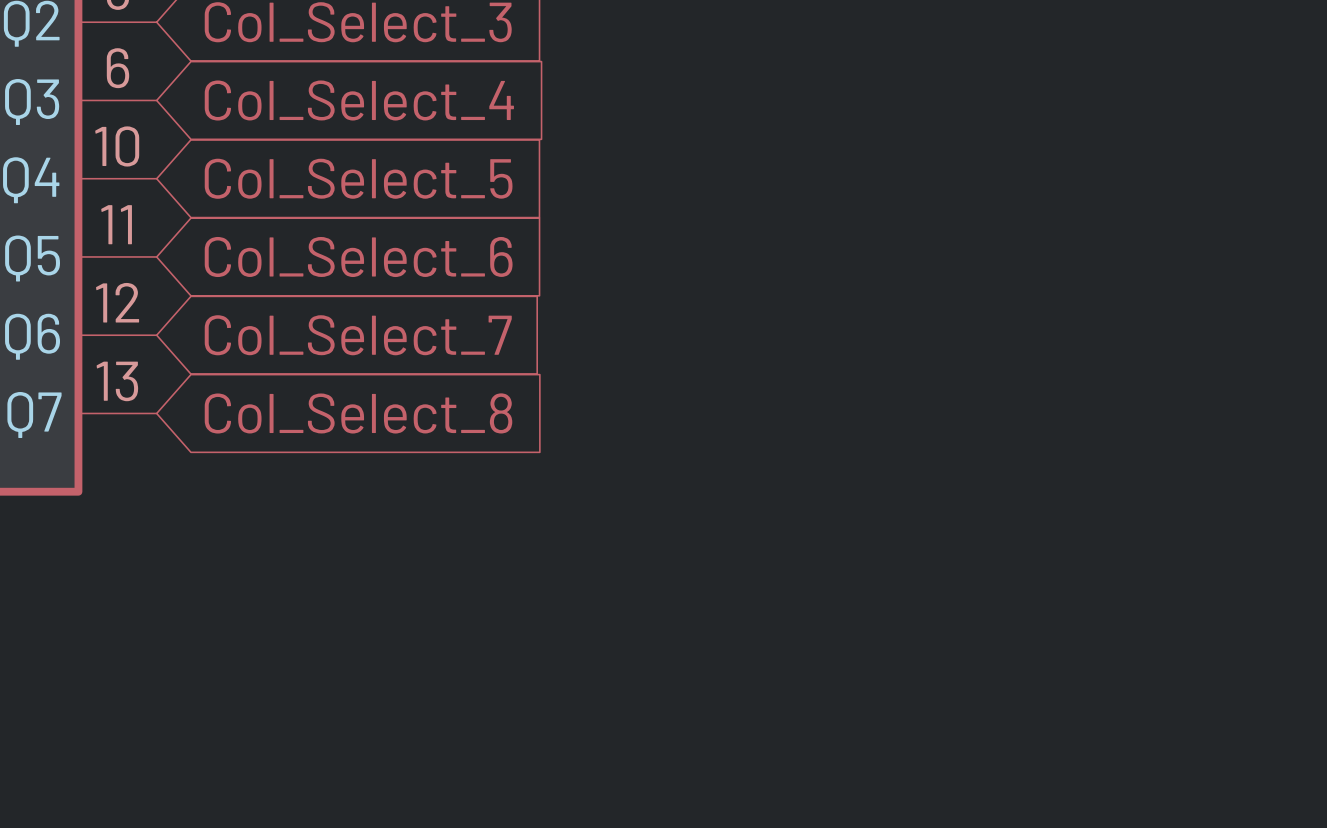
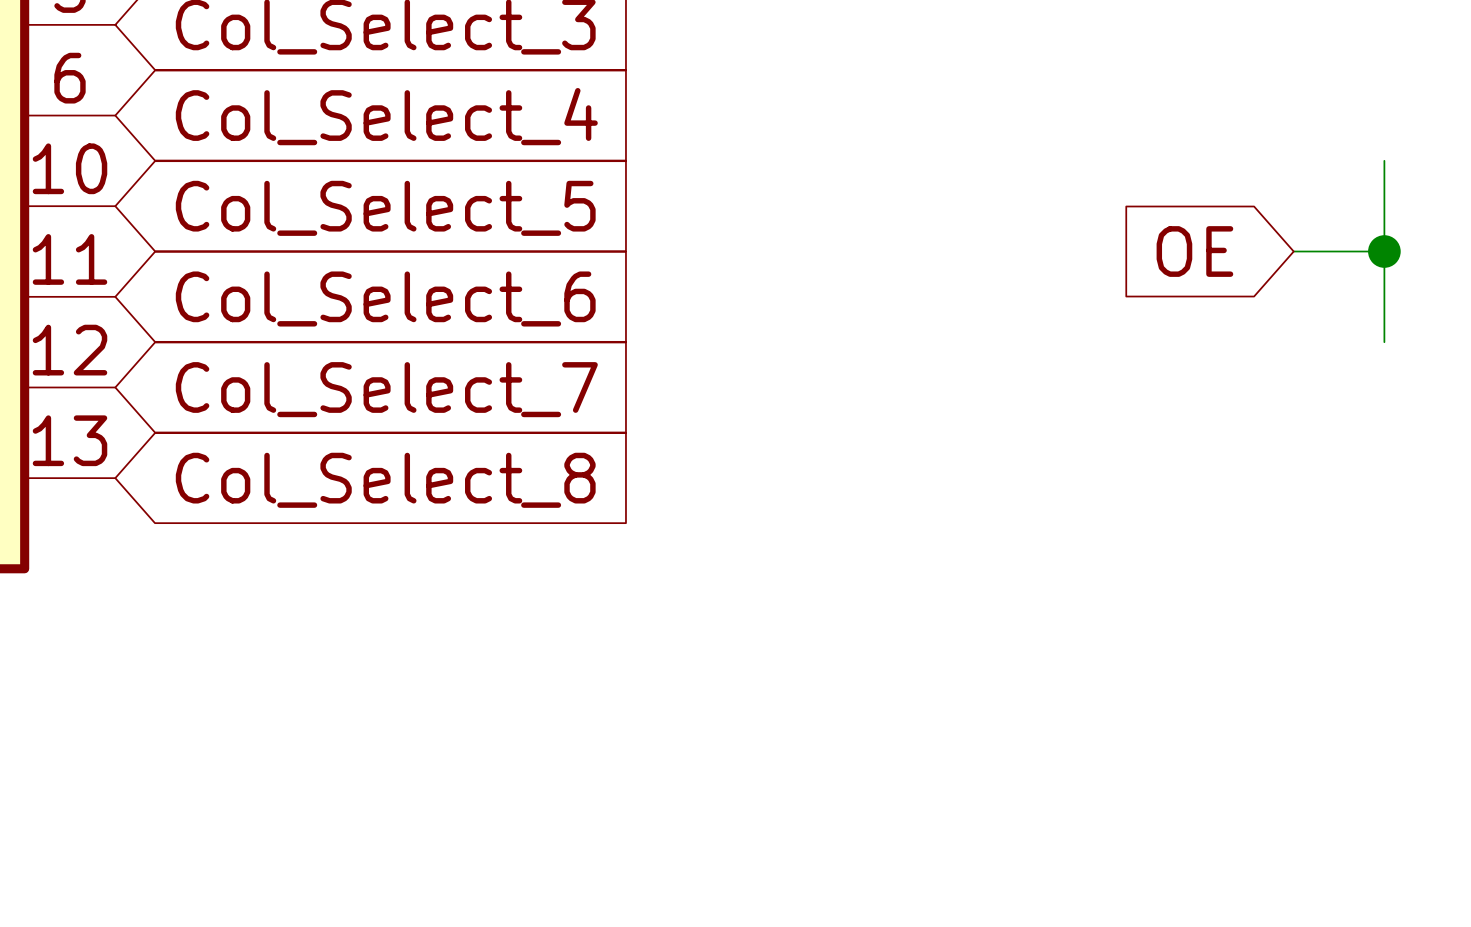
wire: none -> (1384, 160) (1384, 342)
global label: none -> OE (1194, 251)
wire: none -> (1293, 251) (1384, 251)
junction: none -> (1384, 251)

